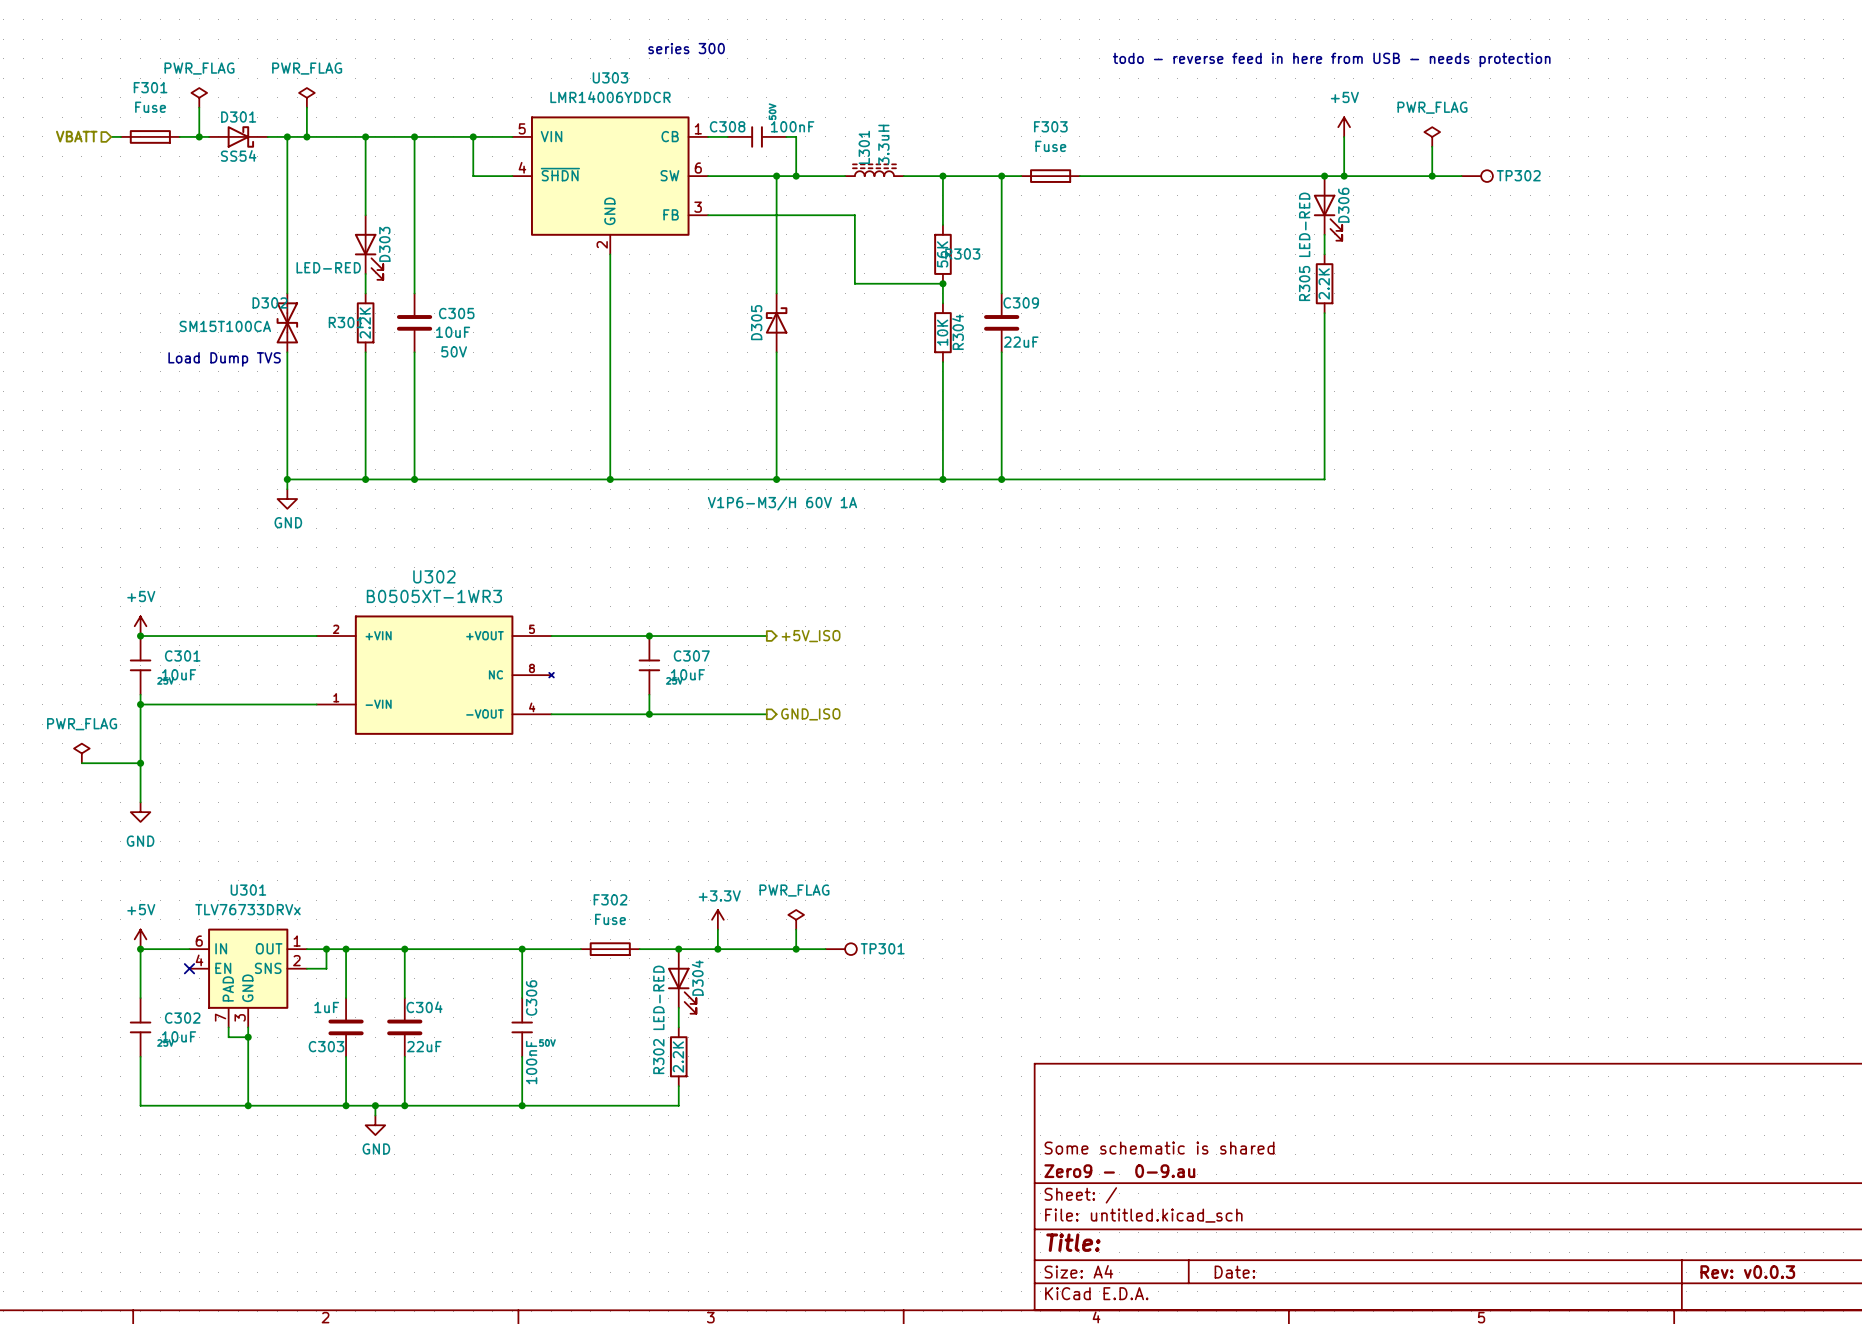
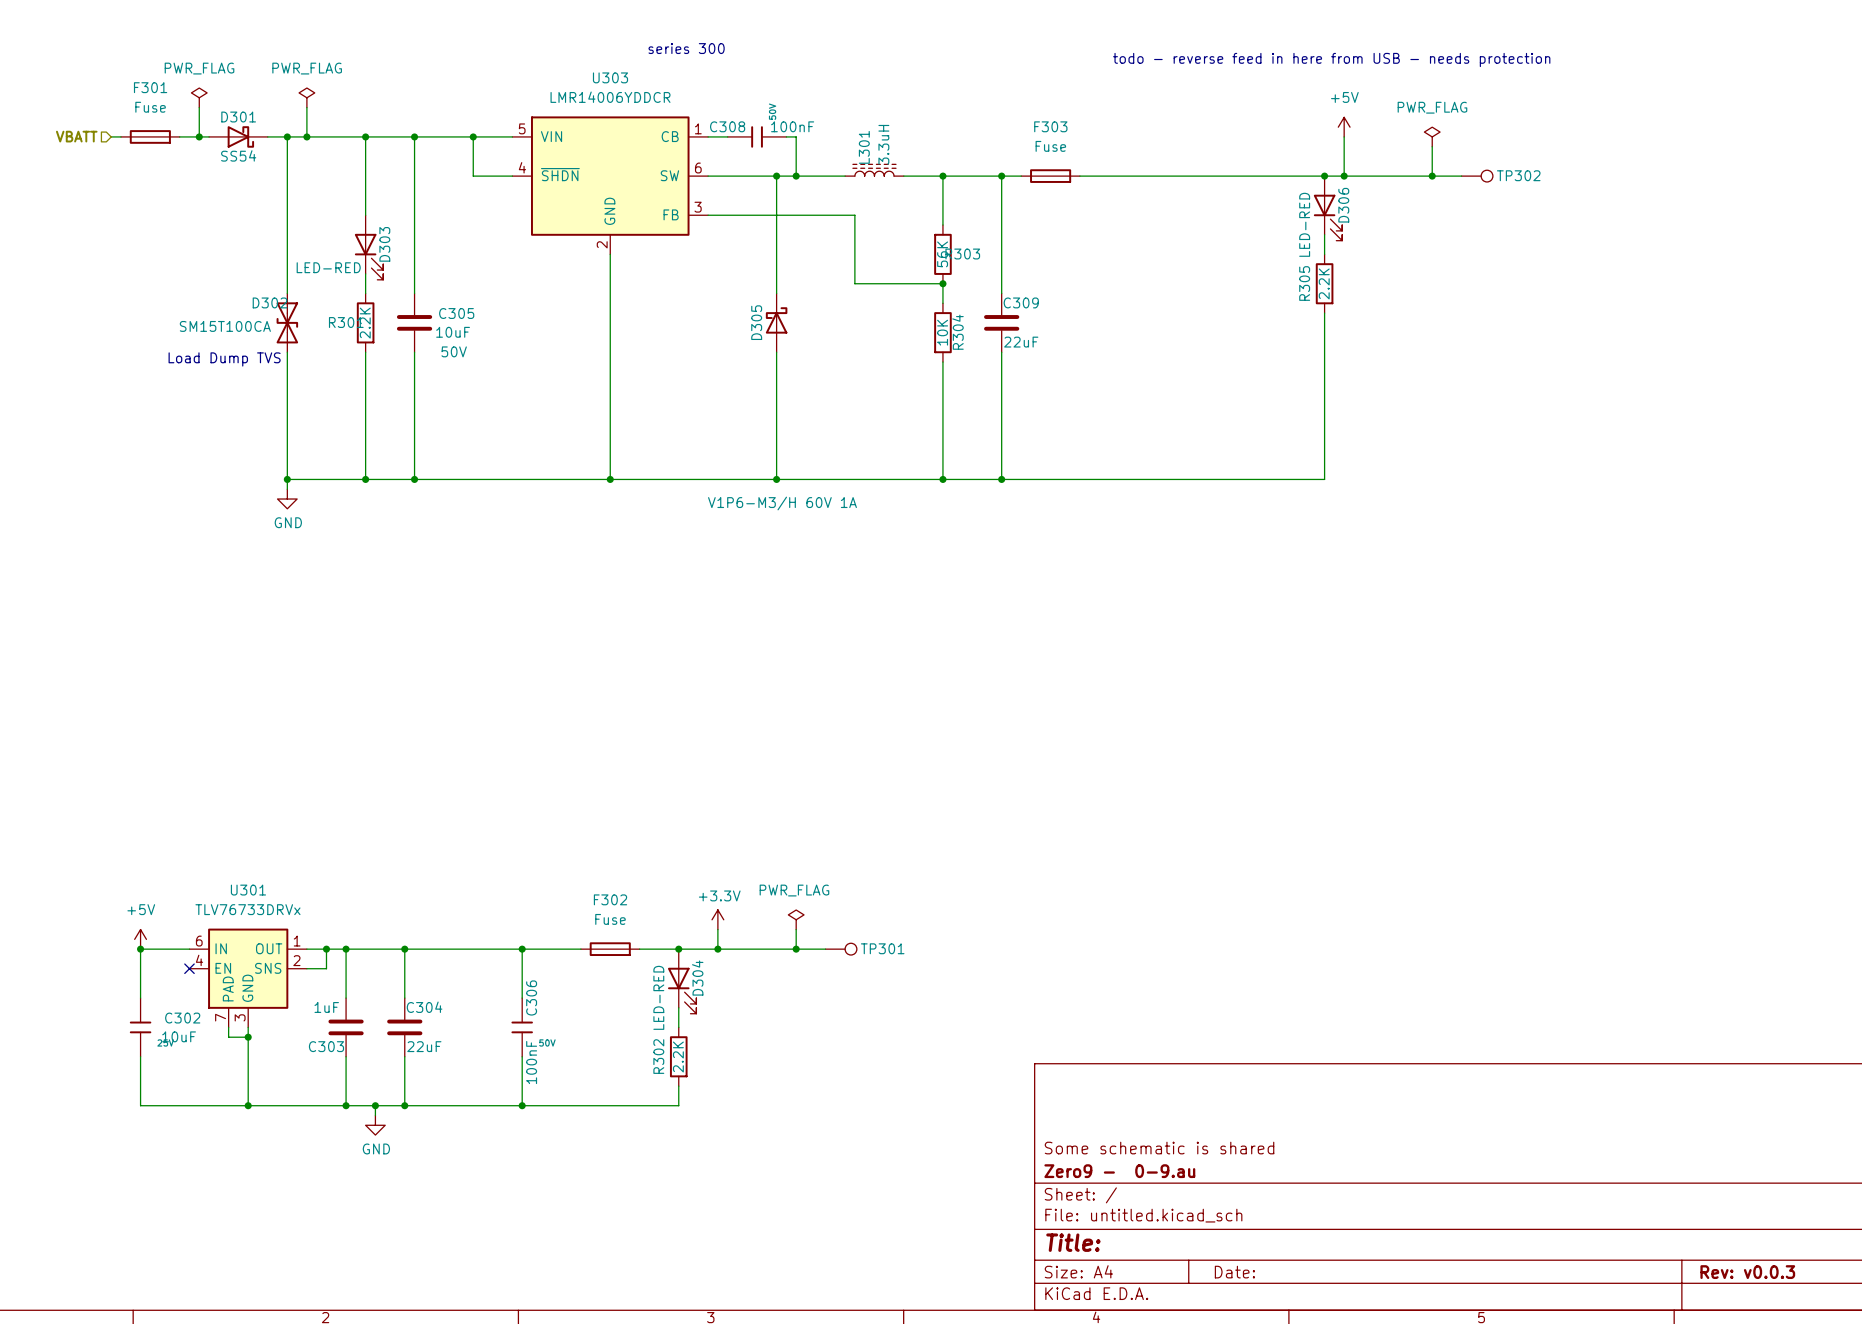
power symbol: +5V (140, 626) -> none
wire: (140, 636) (316, 636) -> none
junction: (140, 636) -> none
wire: (551, 636) (766, 636) -> none
junction: (649, 636) -> none
hierarchical label: +5V_ISO (811, 636) -> none
C301: 10uF (140, 665) -> none
C307: 10uF (649, 665) -> none
U302: B0505XT-1WR3 (435, 675) -> none
wire: (140, 694) (140, 802) -> none
wire: (649, 694) (649, 714) -> none
wire: (140, 704) (316, 704) -> none
junction: (140, 704) -> none
wire: (551, 714) (766, 714) -> none
junction: (649, 714) -> none
hierarchical label: GND_ISO (810, 714) -> none
power symbol: PWR_FLAG (81, 753) -> none
wire: (81, 763) (140, 763) -> none
junction: (140, 763) -> none
power symbol: GND (140, 812) -> none

